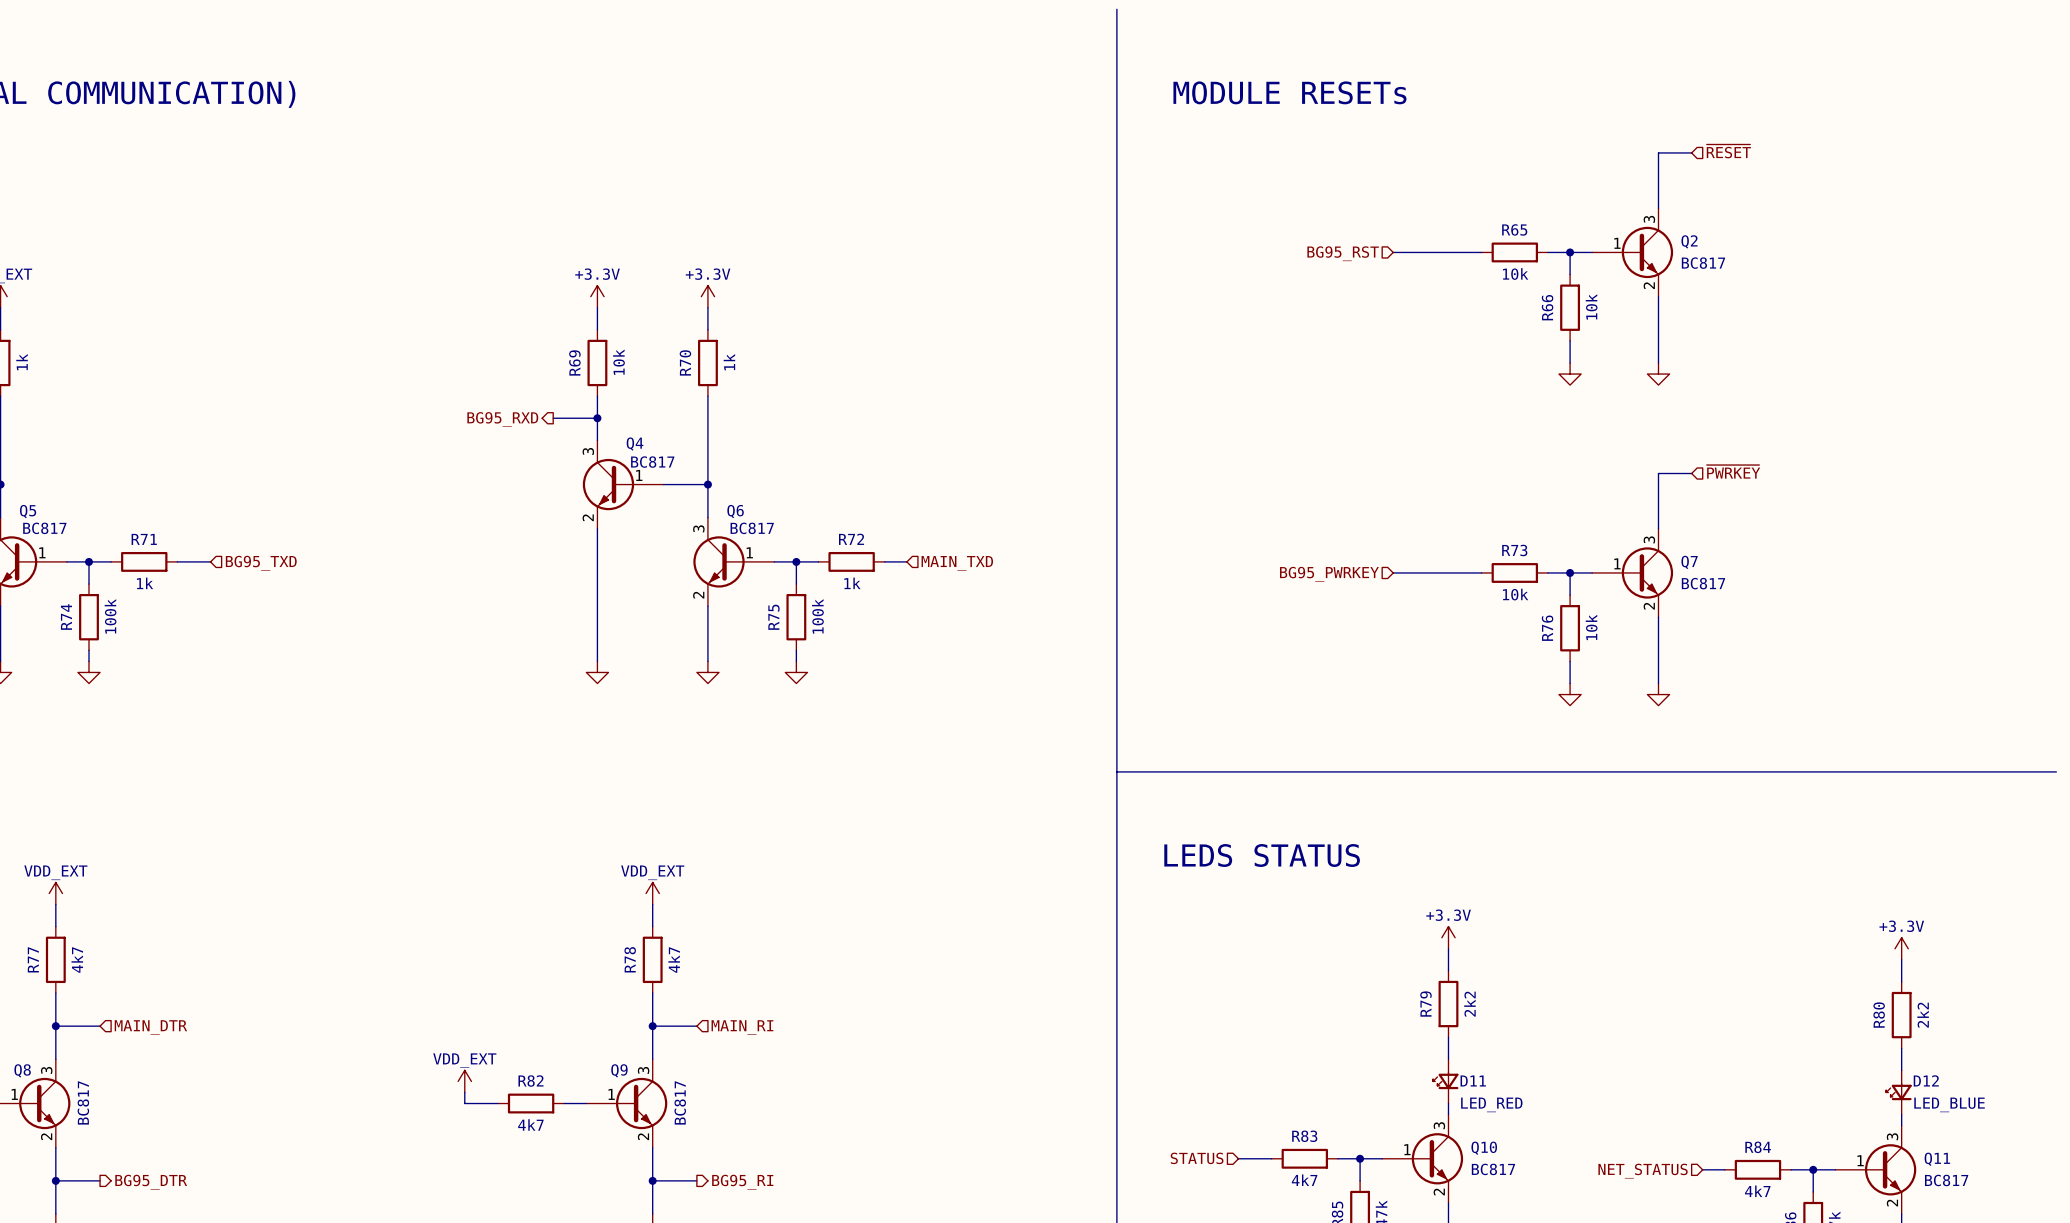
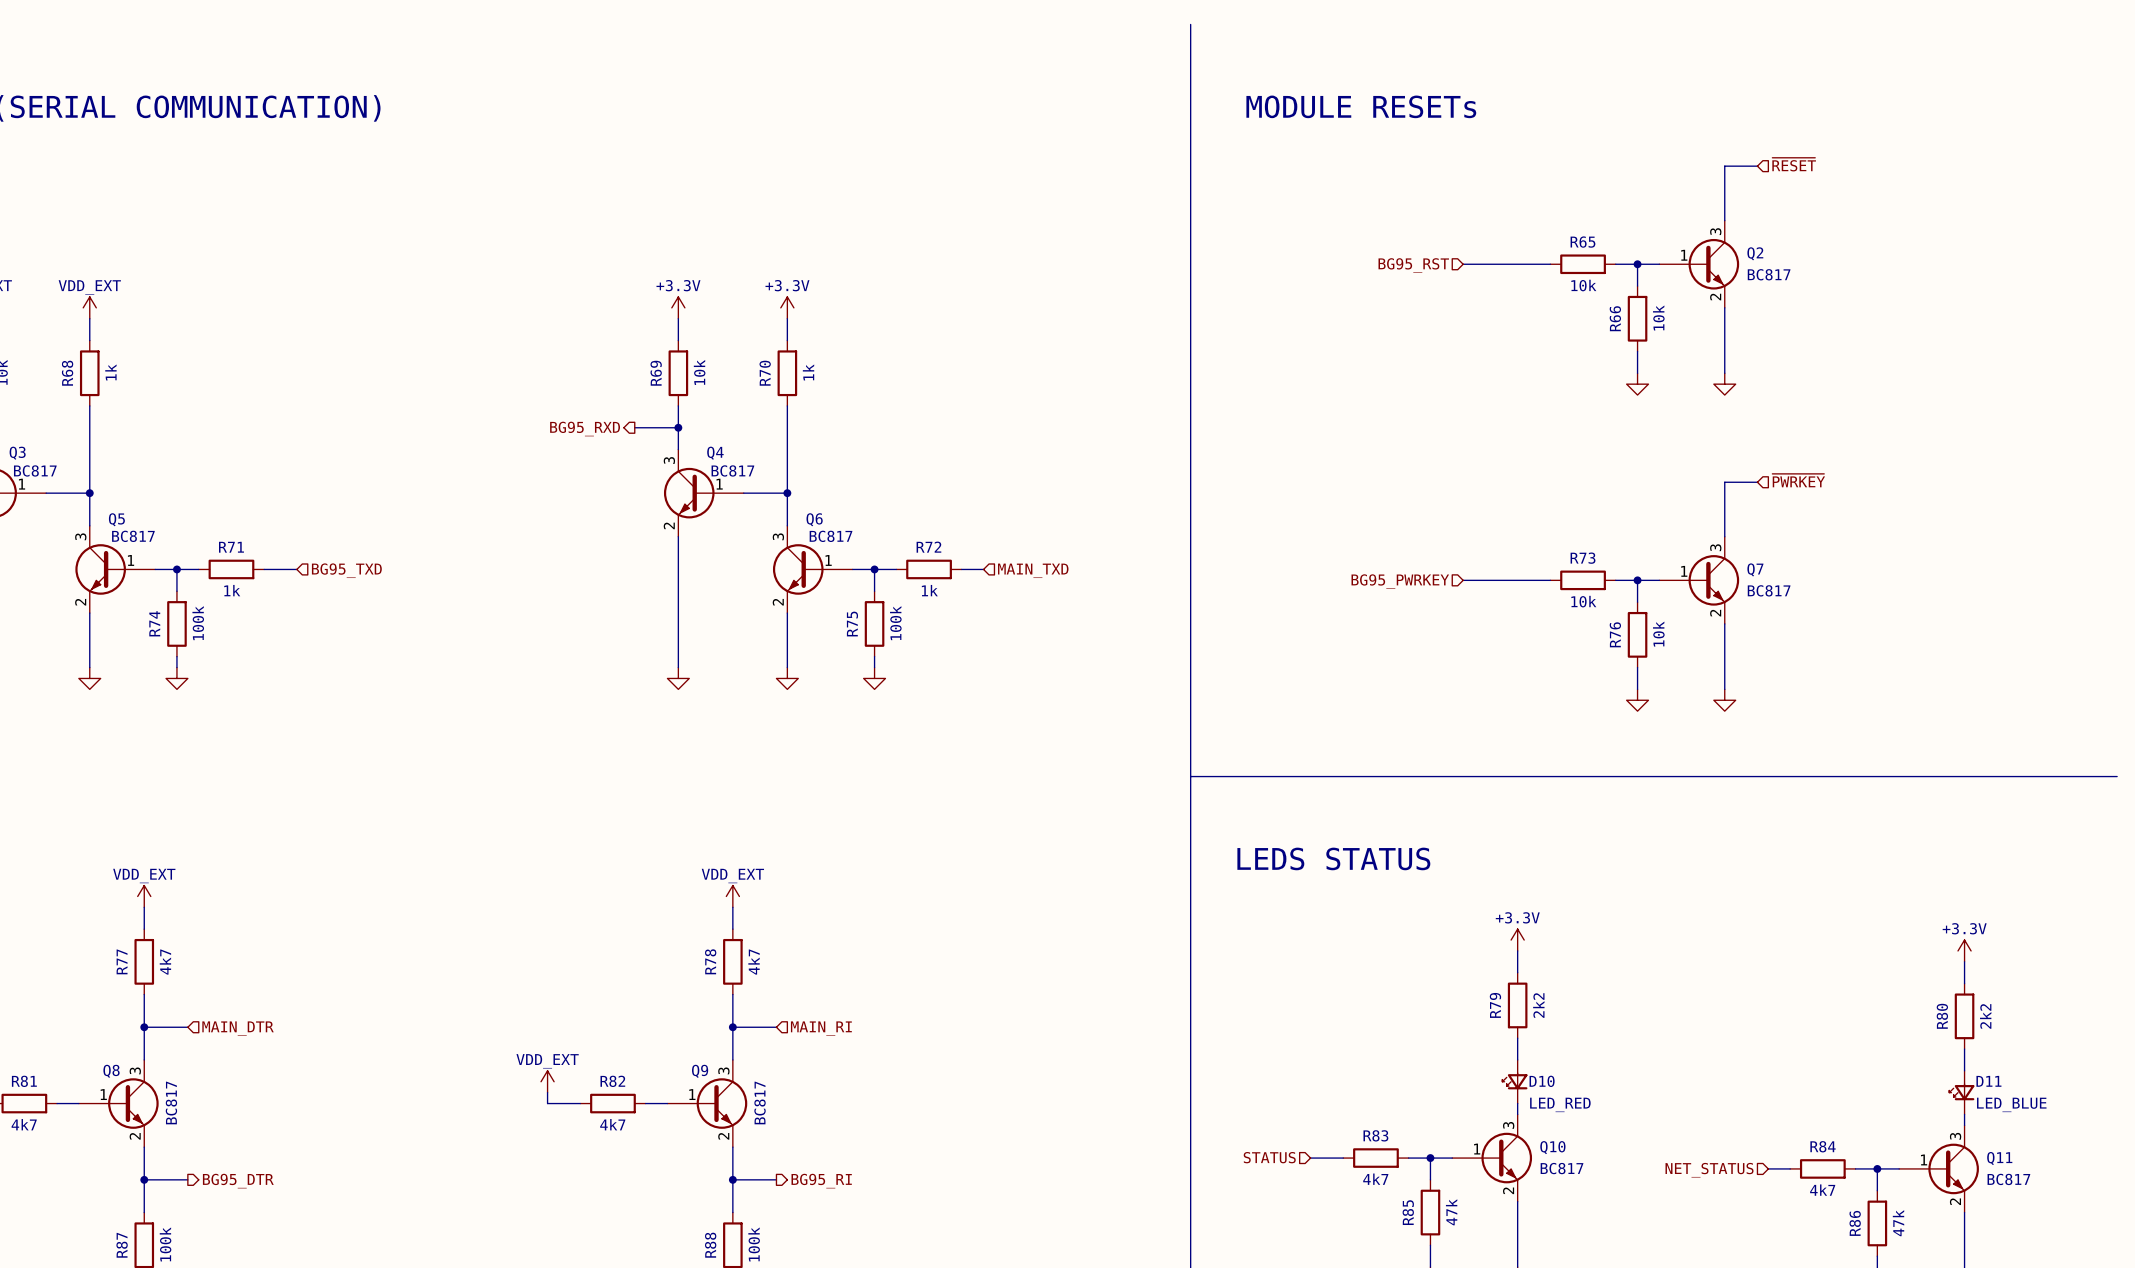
D12 name: D12 (1926, 1080) -> D11 (1988, 1081)
D11 name: D11 (1473, 1081) -> D10 (1542, 1081)

